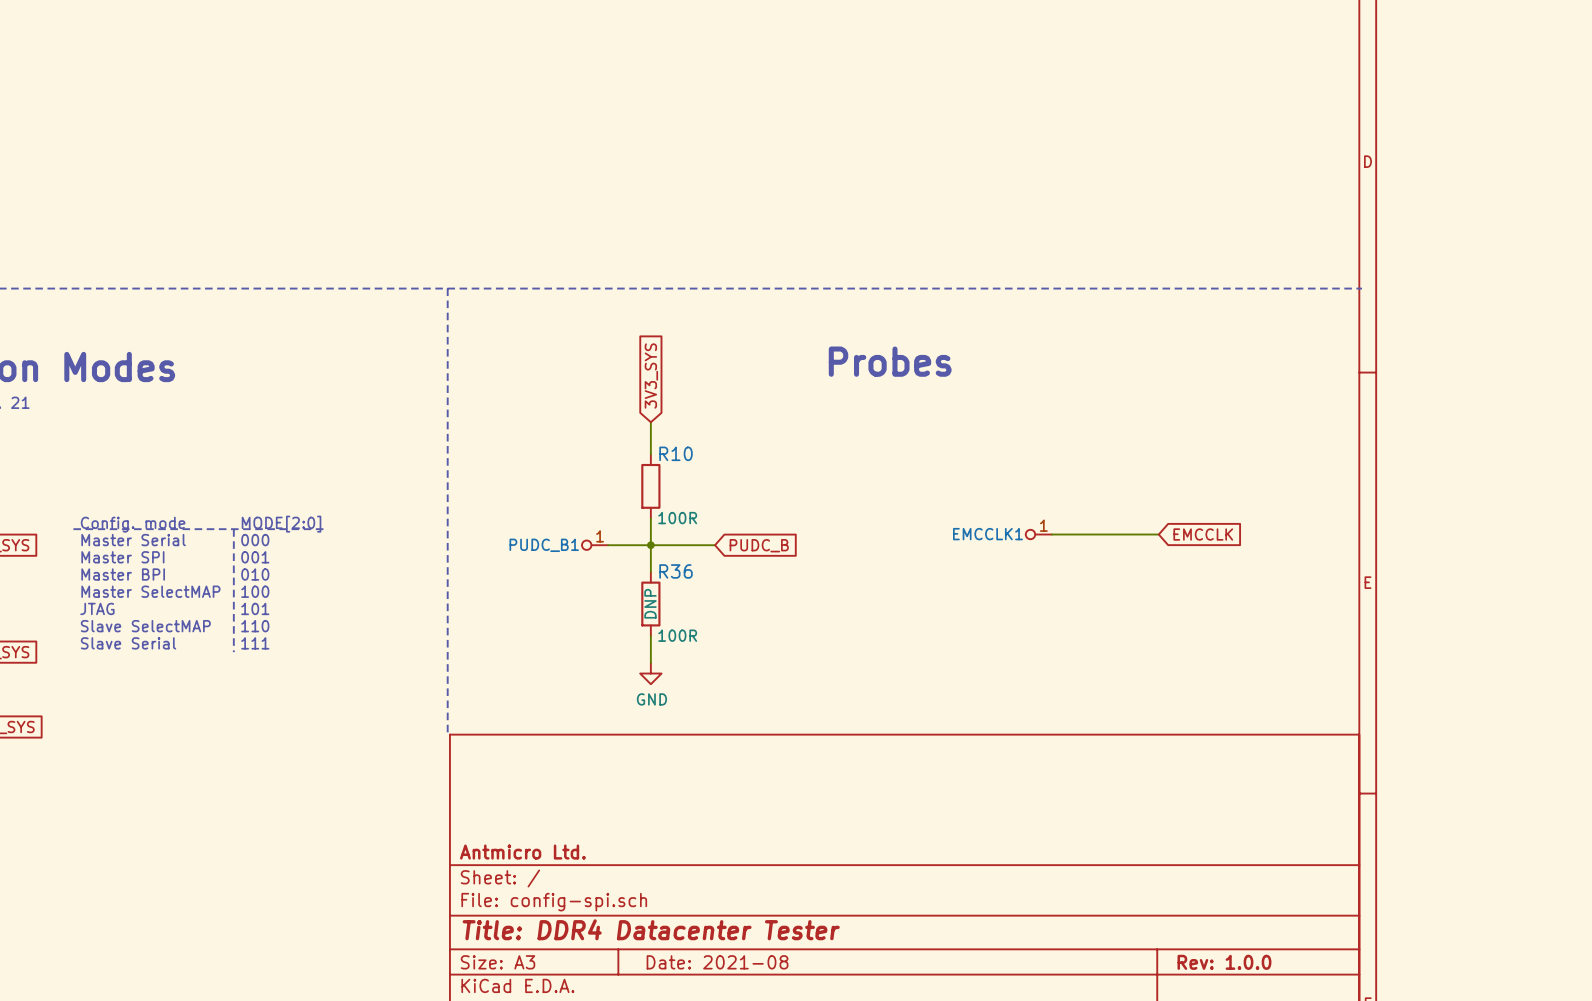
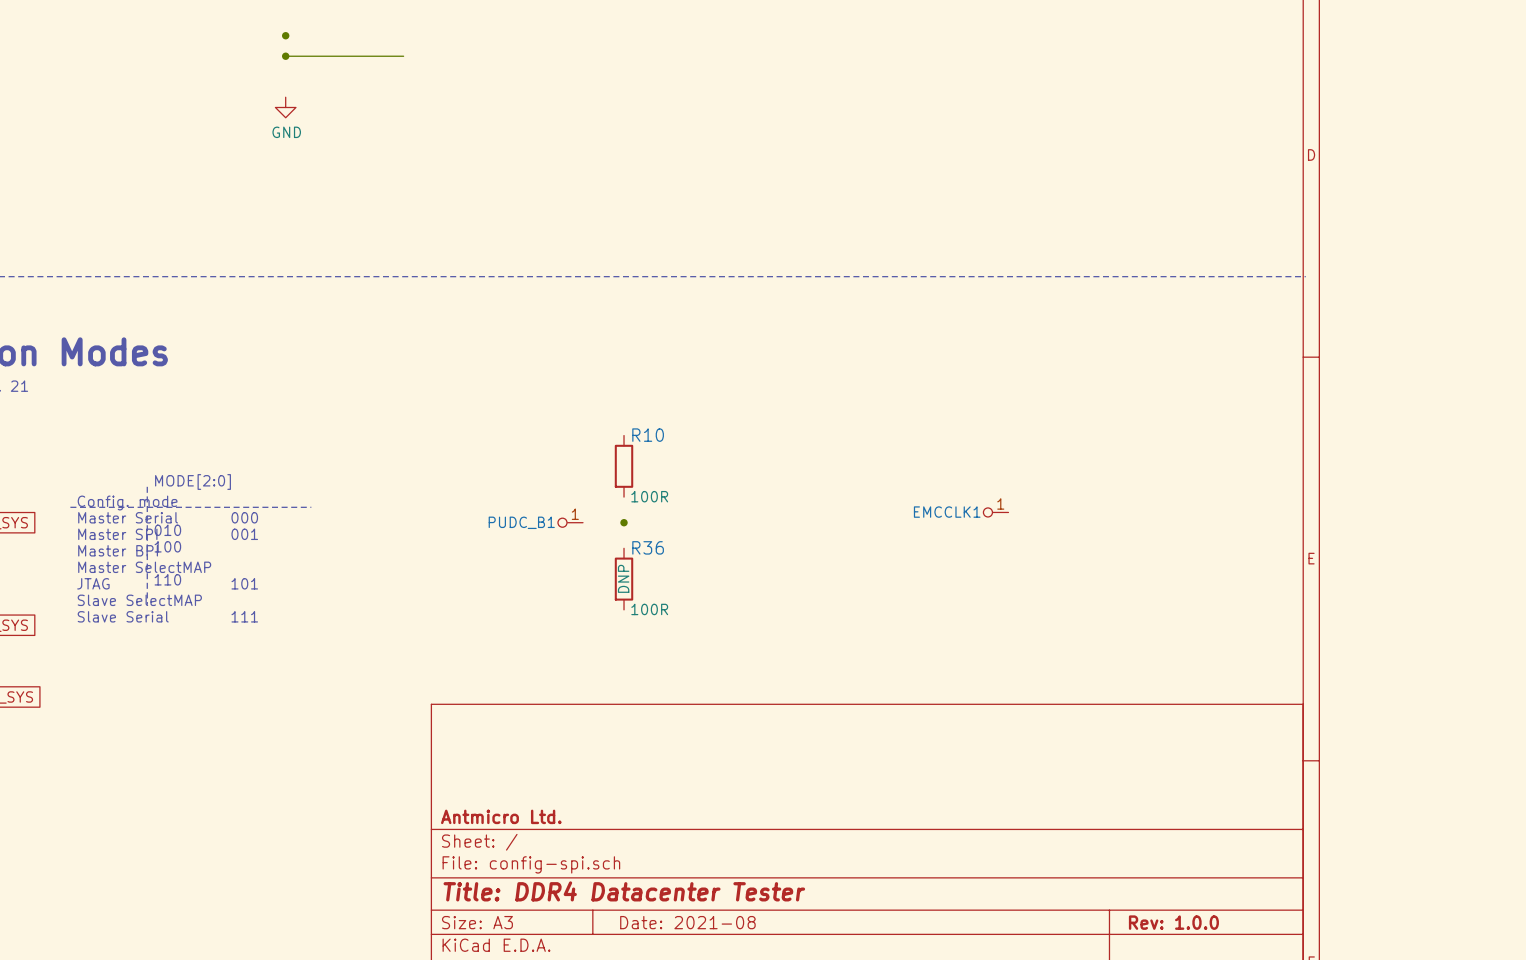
junction: none -> (285, 35)
wire: none -> (285, 56) (403, 56)
junction: none -> (285, 56)
power symbol: none -> GND (285, 107)
line: (447, 288) (447, 732) -> none
text: Probes (890, 361) -> none
global label: 3V3_SYS (651, 376) -> none
wire: (650, 422) (650, 454) -> none
wire: (650, 518) (650, 571) -> none
text position: MODE[2:0] (281, 524) -> MODE[2:0] (193, 482)
line: (233, 529) (233, 652) -> (147, 486) (147, 604)
wire: (1051, 534) (1158, 534) -> none
global label: EMCCLK (1203, 534) -> none
wire: (608, 545) (715, 545) -> none
global label: PUDC_B (759, 545) -> none
text position: 010 (255, 574) -> 010 (167, 530)
text position: 100 (255, 591) -> 100 (167, 546)
text position: 110 (255, 626) -> 110 (167, 579)
wire: (650, 636) (650, 662) -> none
power symbol: GND (650, 673) -> none

